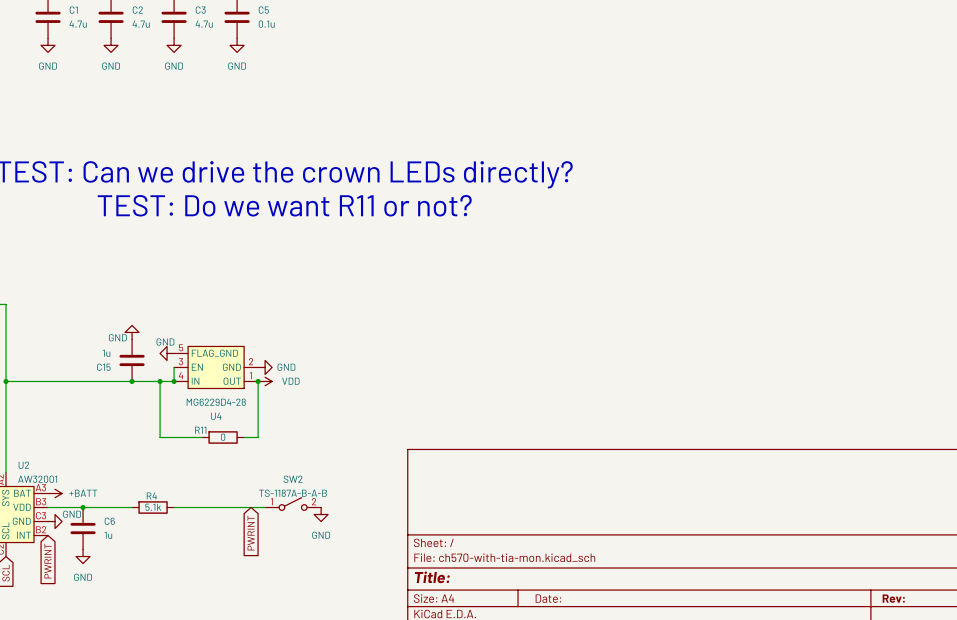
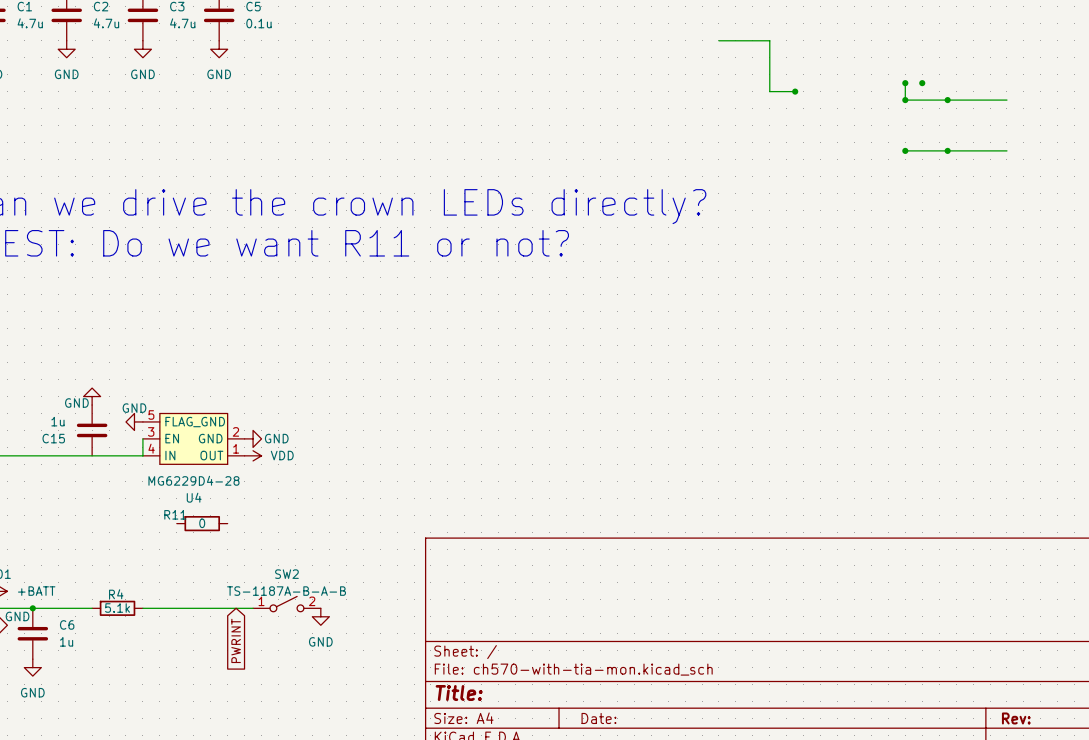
wire: none -> (718, 40) (769, 40) (769, 91) (795, 91)
wire: none -> (905, 83) (905, 100) (1006, 100)
junction: none -> (905, 83)
junction: none -> (922, 83)
junction: none -> (795, 91)
junction: none -> (905, 100)
junction: none -> (947, 100)
wire: none -> (905, 150) (1006, 150)
junction: none -> (905, 150)
junction: none -> (947, 150)
junction: (132, 381) -> none
wire: (160, 381) (160, 437) (202, 437) -> none
junction: (160, 381) -> none
junction: (174, 381) -> none
wire: (258, 381) (258, 437) (244, 437) -> none
junction: (258, 381) -> none

